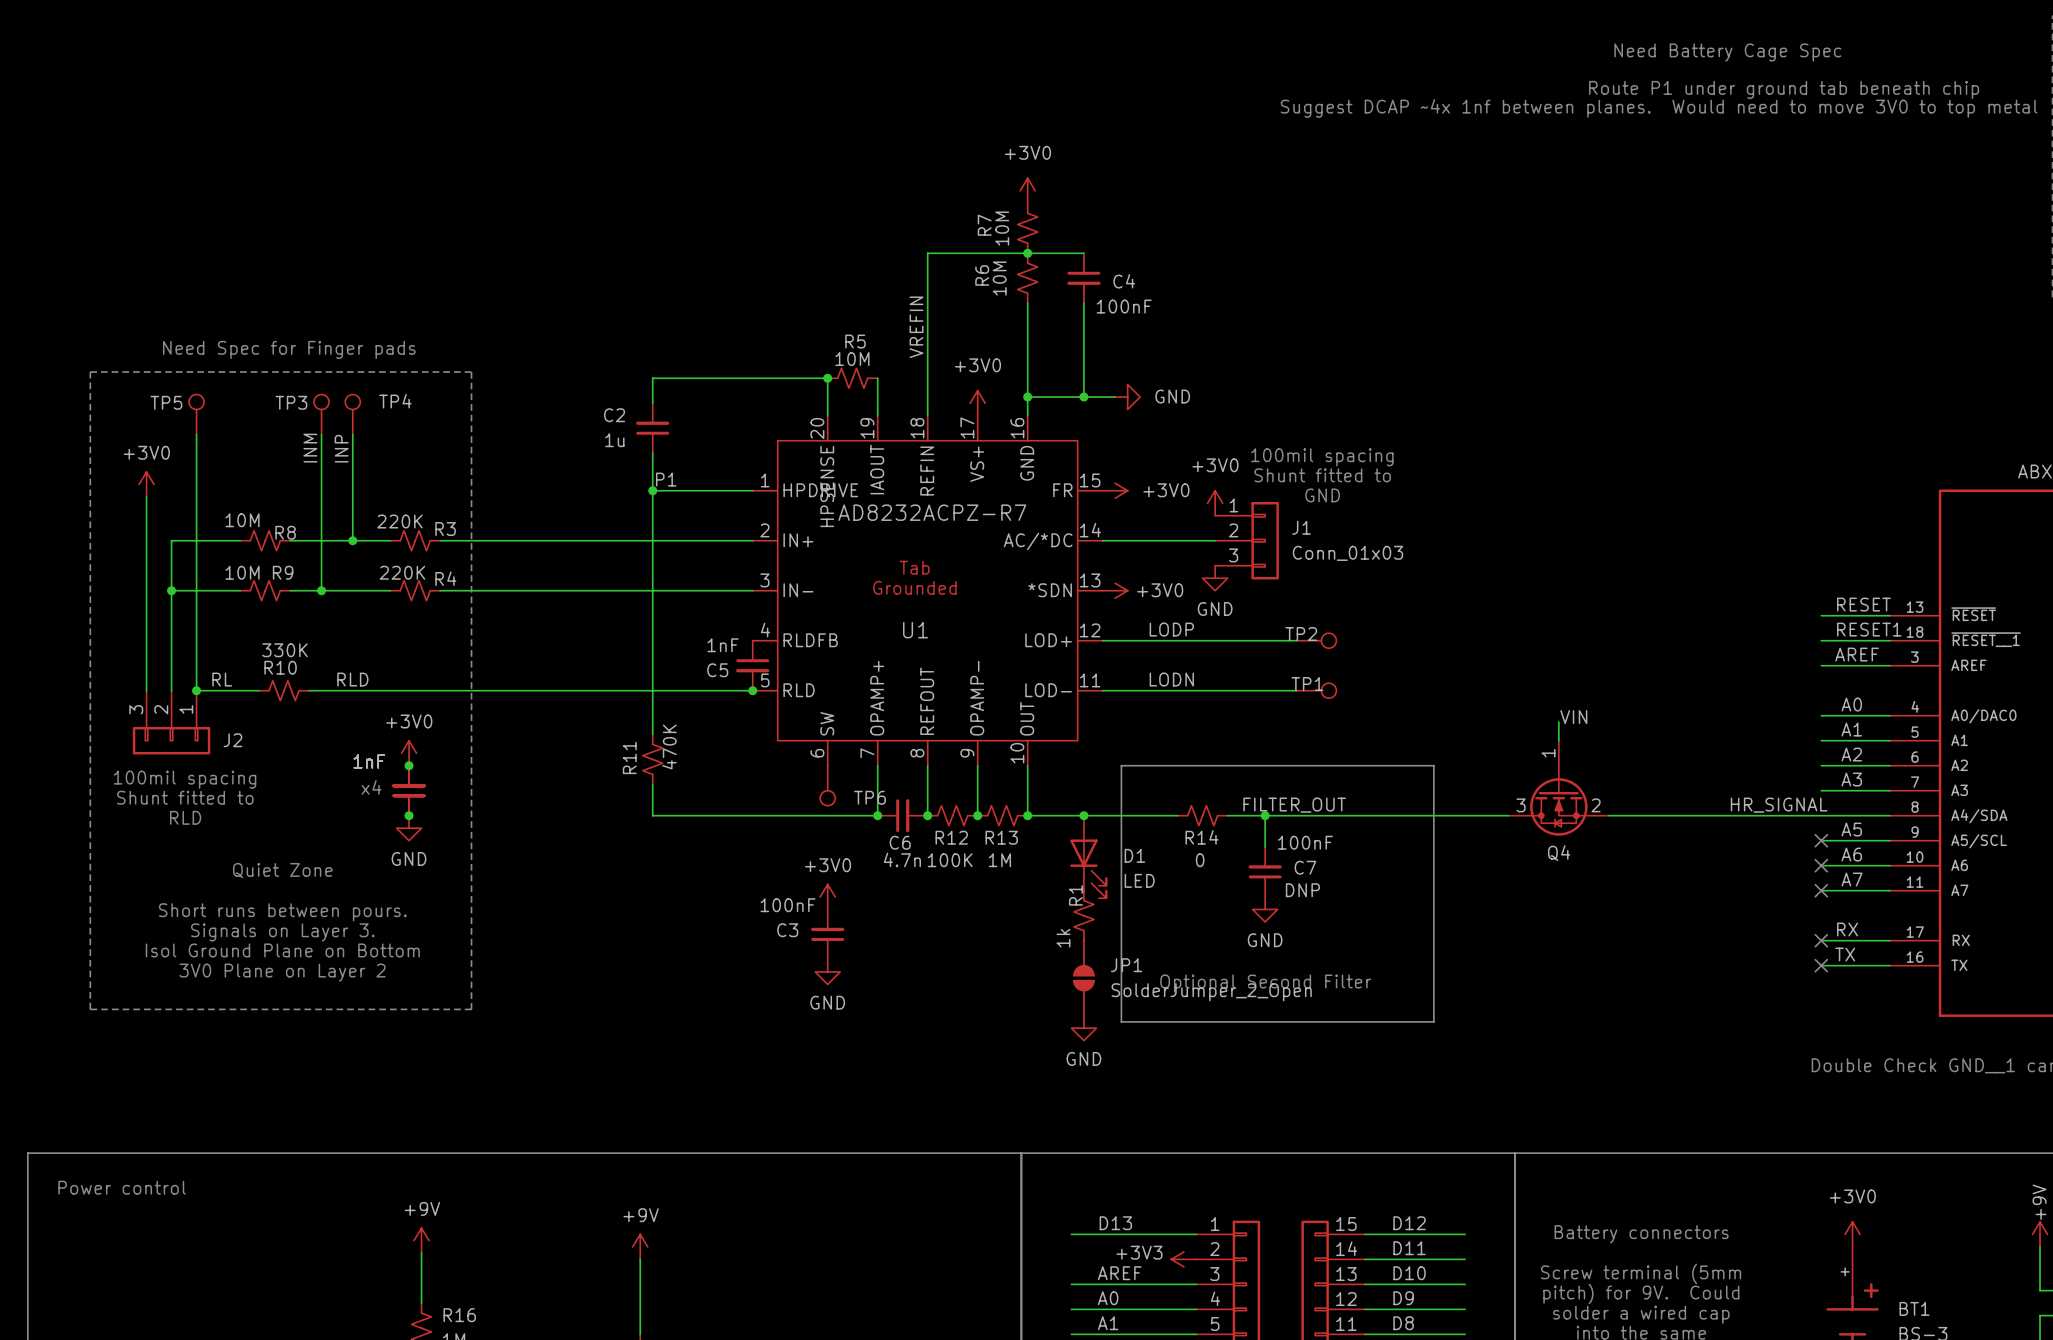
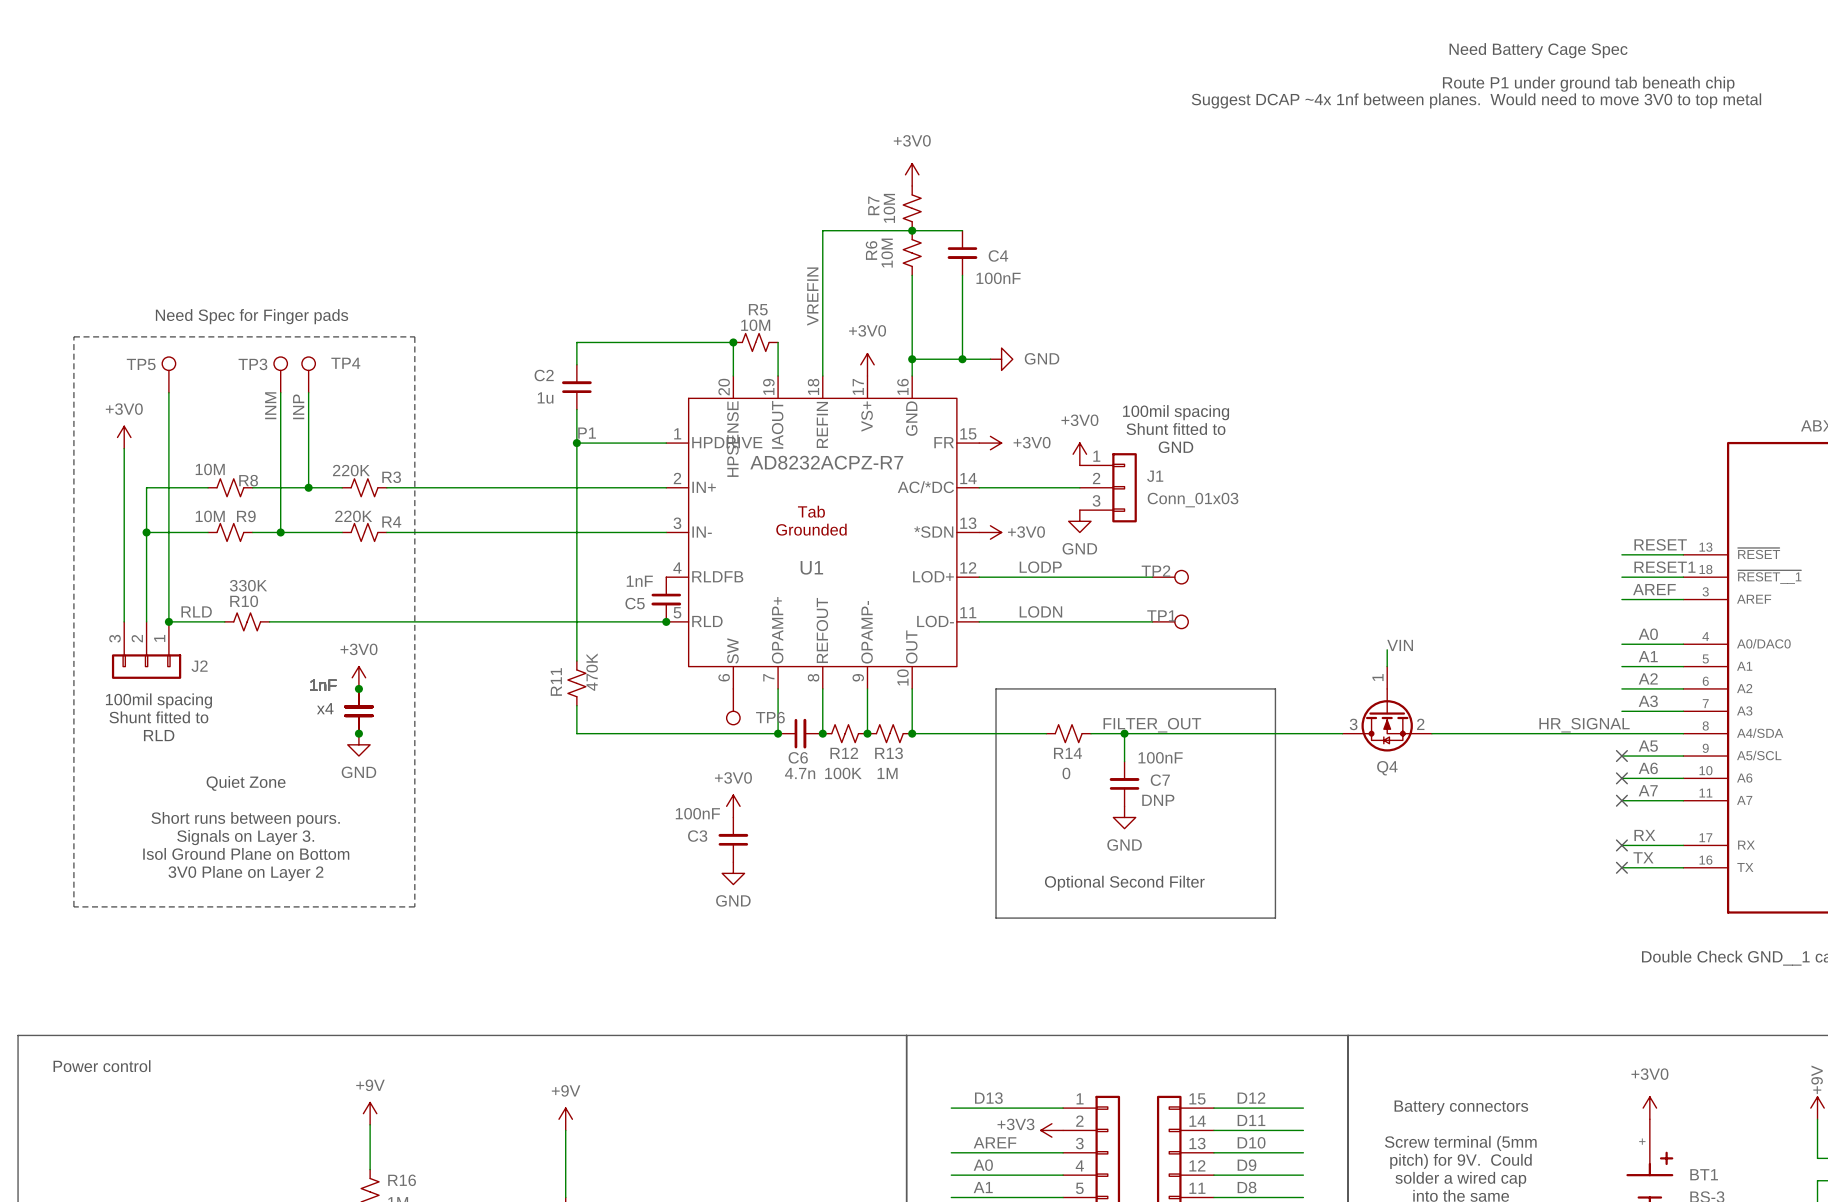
label: RL (222, 679) -> RLD (196, 611)
label: RLD (352, 679) -> none
junction: (1083, 815) -> none
D1: LED (1088, 856) -> none
R1: 1k (1083, 915) -> none
JP1: SolderJumper_2_Open (1083, 978) -> none
power symbol: GND (1083, 1028) -> none

